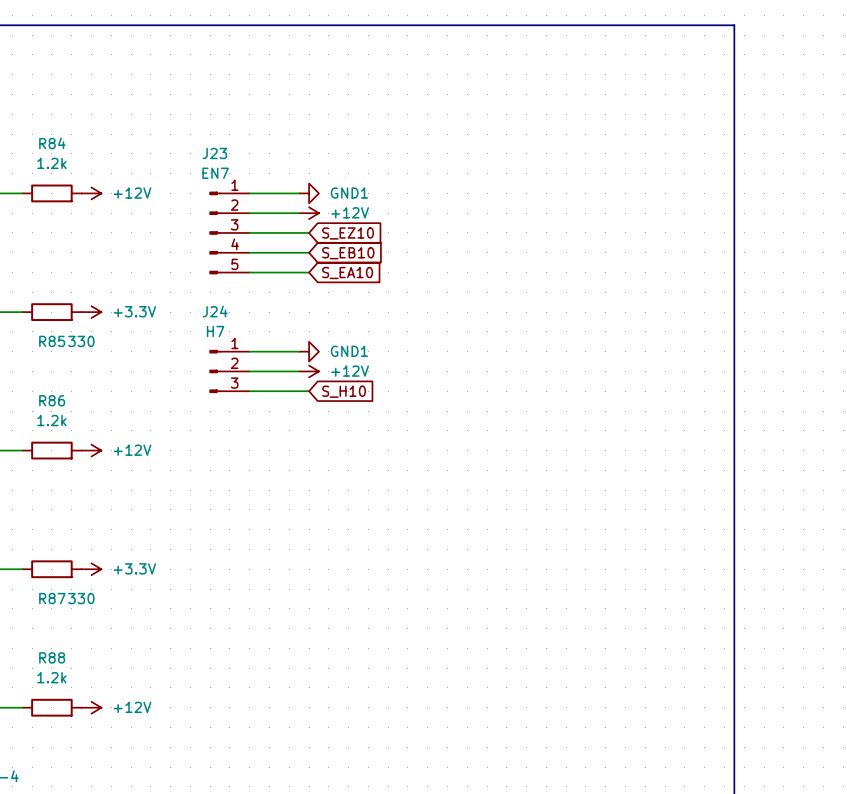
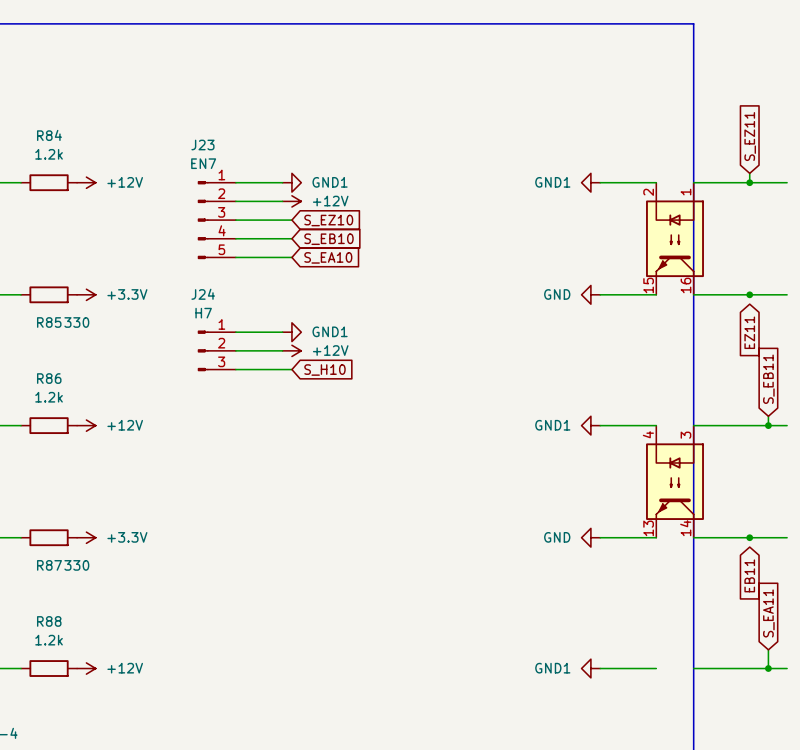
global label: none -> S_EZ11 (750, 136)
wire: none -> (749, 173) (749, 182)
power symbol: none -> GND1 (590, 182)
wire: none -> (600, 182) (656, 182)
wire: none -> (693, 182) (787, 182)
junction: none -> (749, 182)
part: none -> (674, 238)
power symbol: none -> GND (590, 294)
wire: none -> (600, 294) (656, 294)
wire: none -> (693, 294) (787, 294)
junction: none -> (749, 294)
global label: none -> EZ11 (749, 332)
global label: none -> S_EB11 (768, 379)
wire: none -> (768, 416) (768, 425)
power symbol: none -> GND1 (590, 425)
wire: none -> (600, 425) (656, 425)
wire: none -> (693, 425) (787, 425)
junction: none -> (768, 425)
part: none -> (674, 481)
power symbol: none -> GND (590, 537)
wire: none -> (600, 537) (656, 537)
wire: none -> (693, 537) (787, 537)
junction: none -> (749, 537)
global label: none -> EB11 (749, 575)
global label: none -> S_EA11 (768, 613)
wire: none -> (768, 649) (768, 668)
power symbol: none -> GND1 (590, 668)
wire: none -> (600, 668) (656, 668)
wire: none -> (693, 668) (787, 668)
junction: none -> (768, 668)

